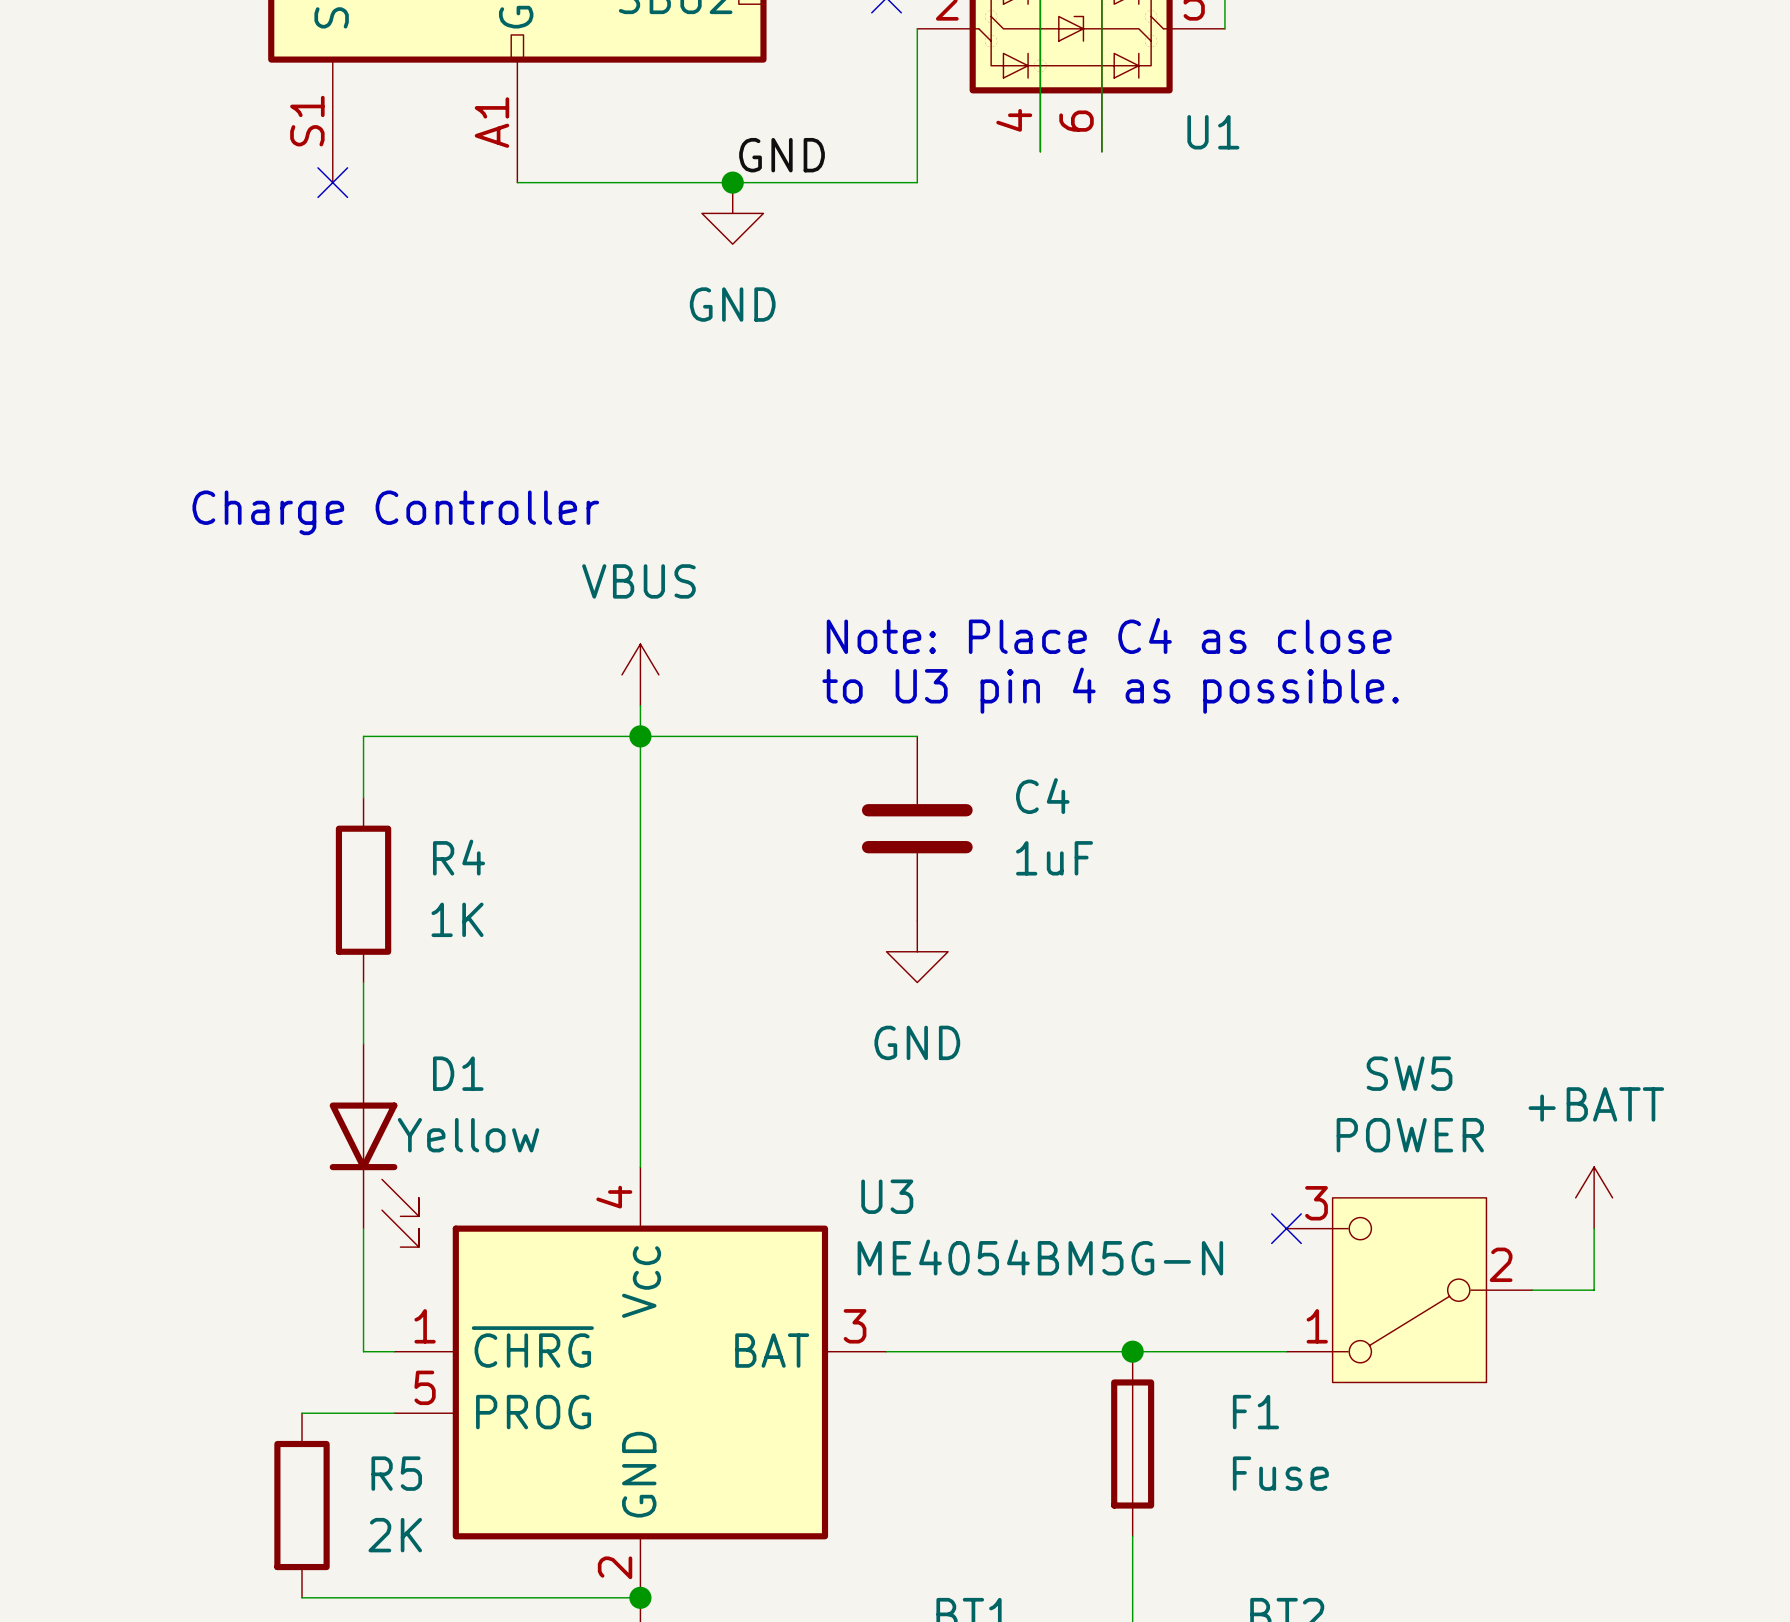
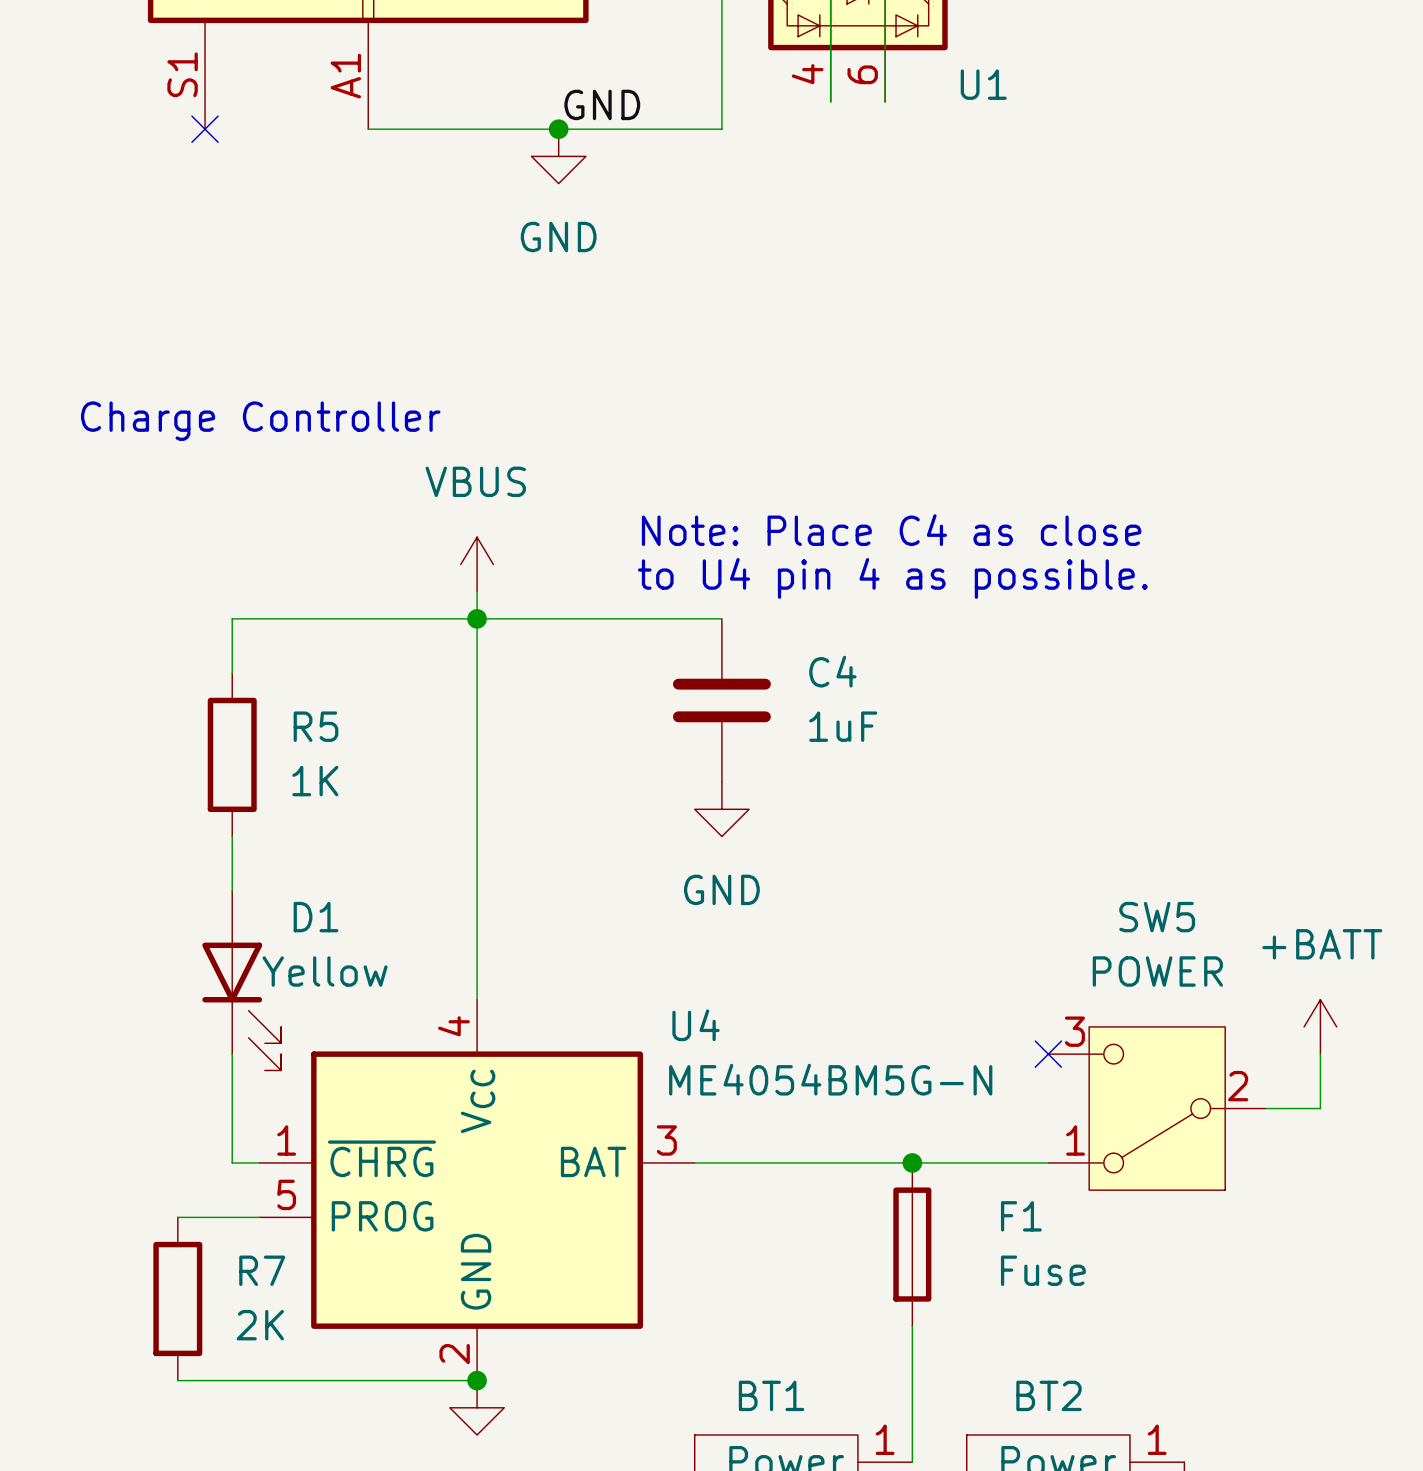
text: to U3 pin 4 as possible. (1110, 690) -> to U4 pin 4 as possible. (892, 578)
R4 name: R4 (458, 857) -> R5 (315, 726)
U3 name: U3 (887, 1196) -> U4 (696, 1025)
R5 name: R5 (396, 1473) -> R7 (262, 1270)

